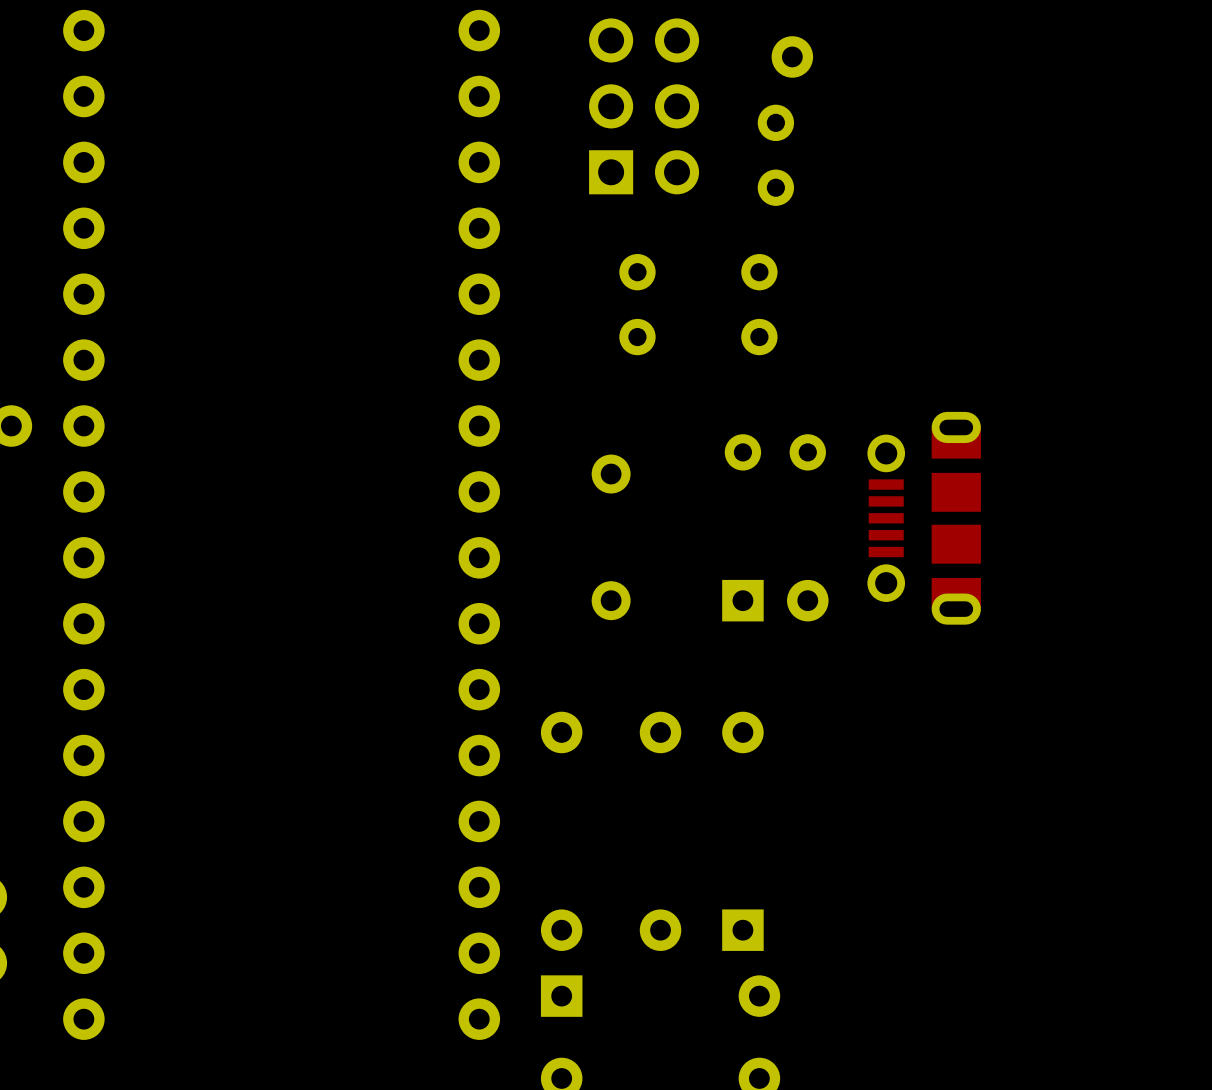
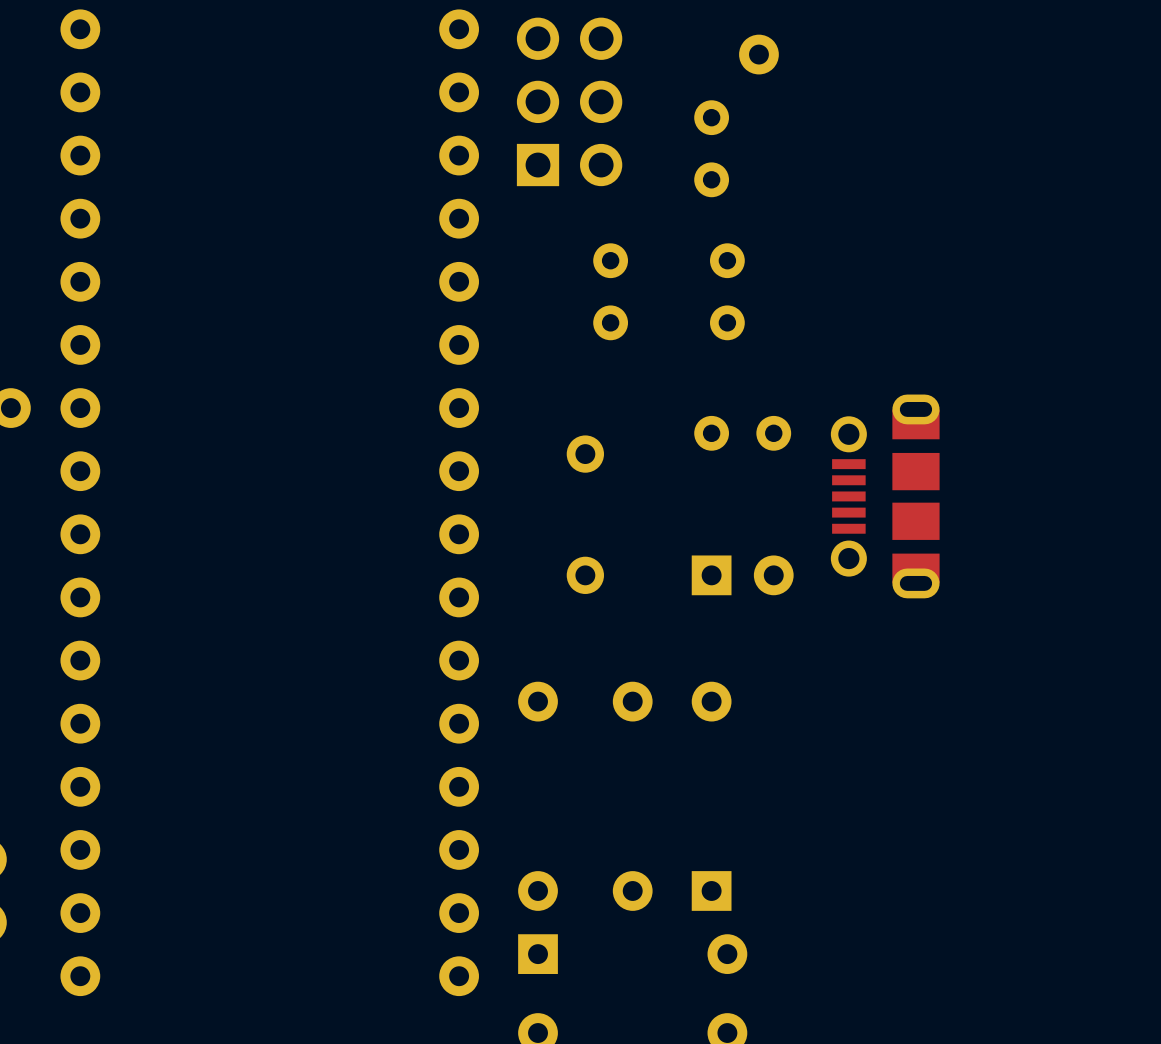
part position: (644, 106) -> (569, 101)
part position: (775, 155) -> (711, 148)

